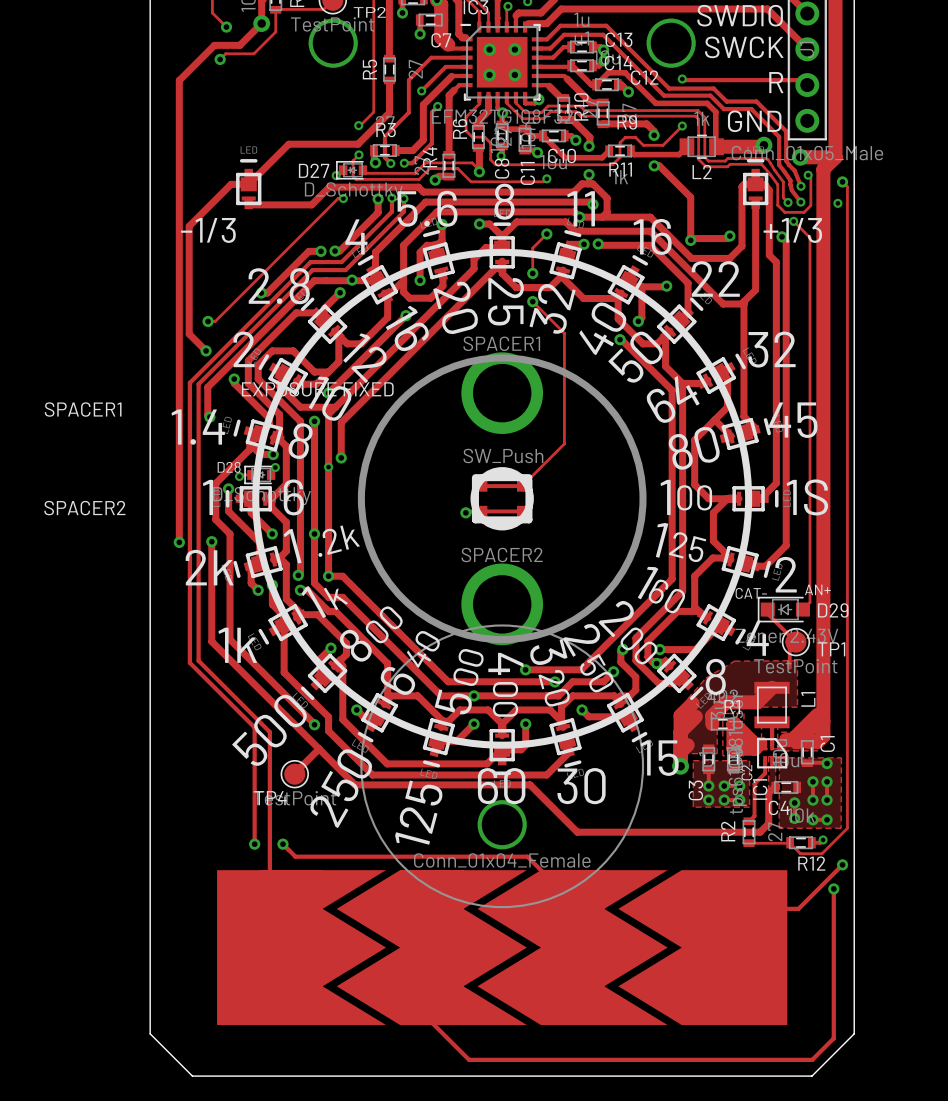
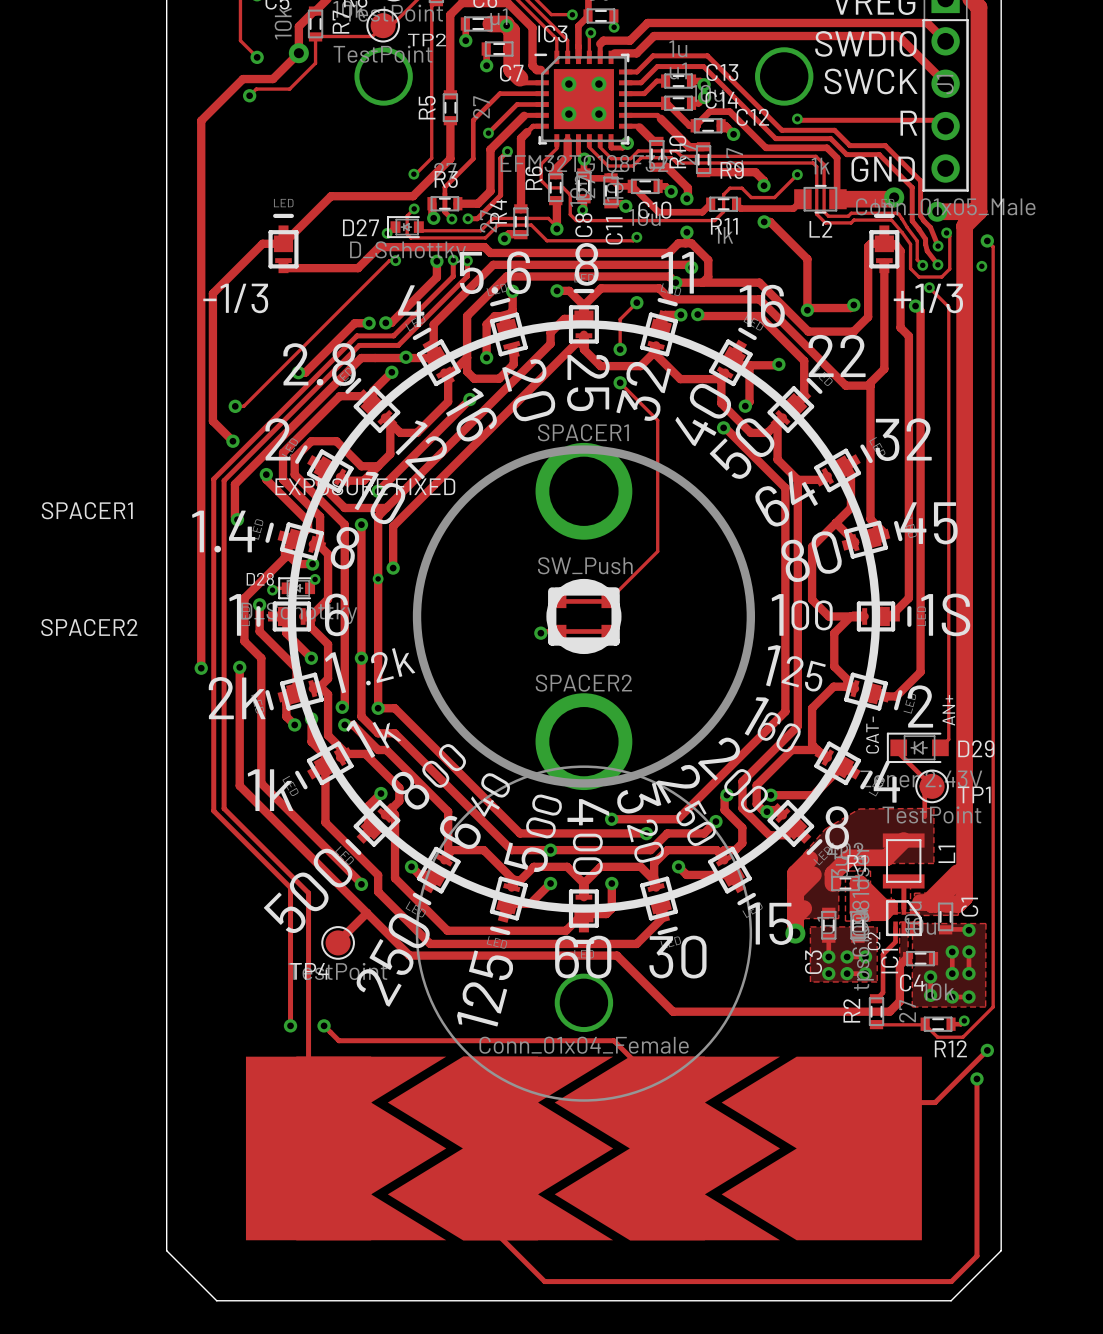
text rotation: 0° (817, 589) -> 90° counterclockwise (948, 710)
text rotation: 0° (751, 593) -> 90° counterclockwise (872, 735)

